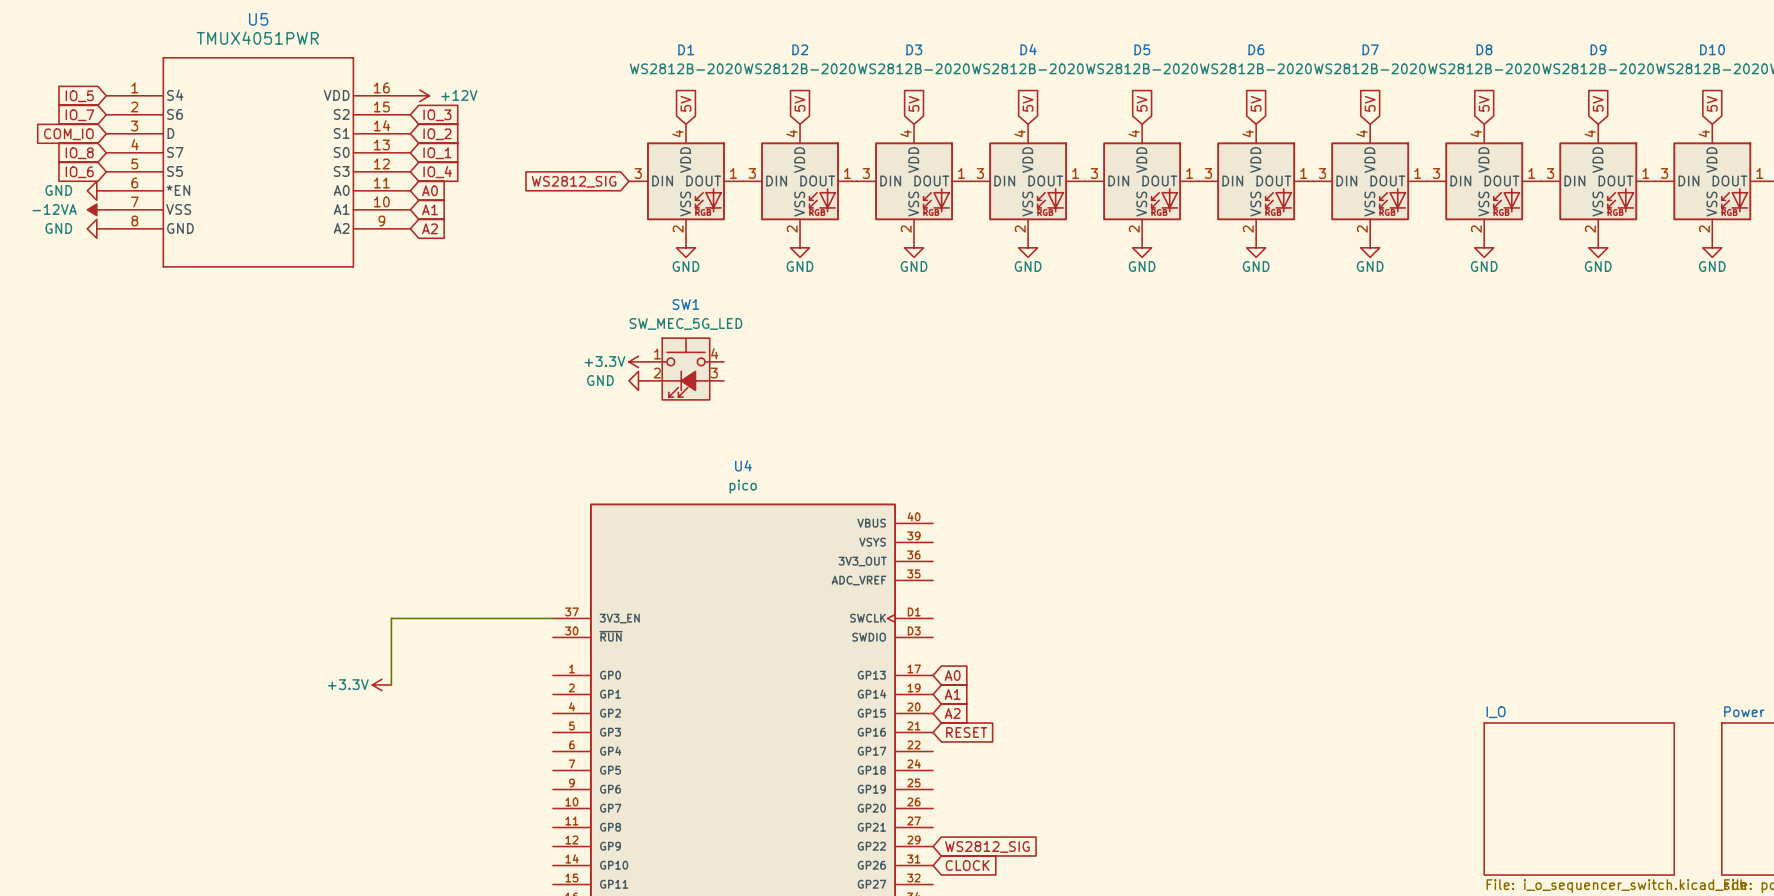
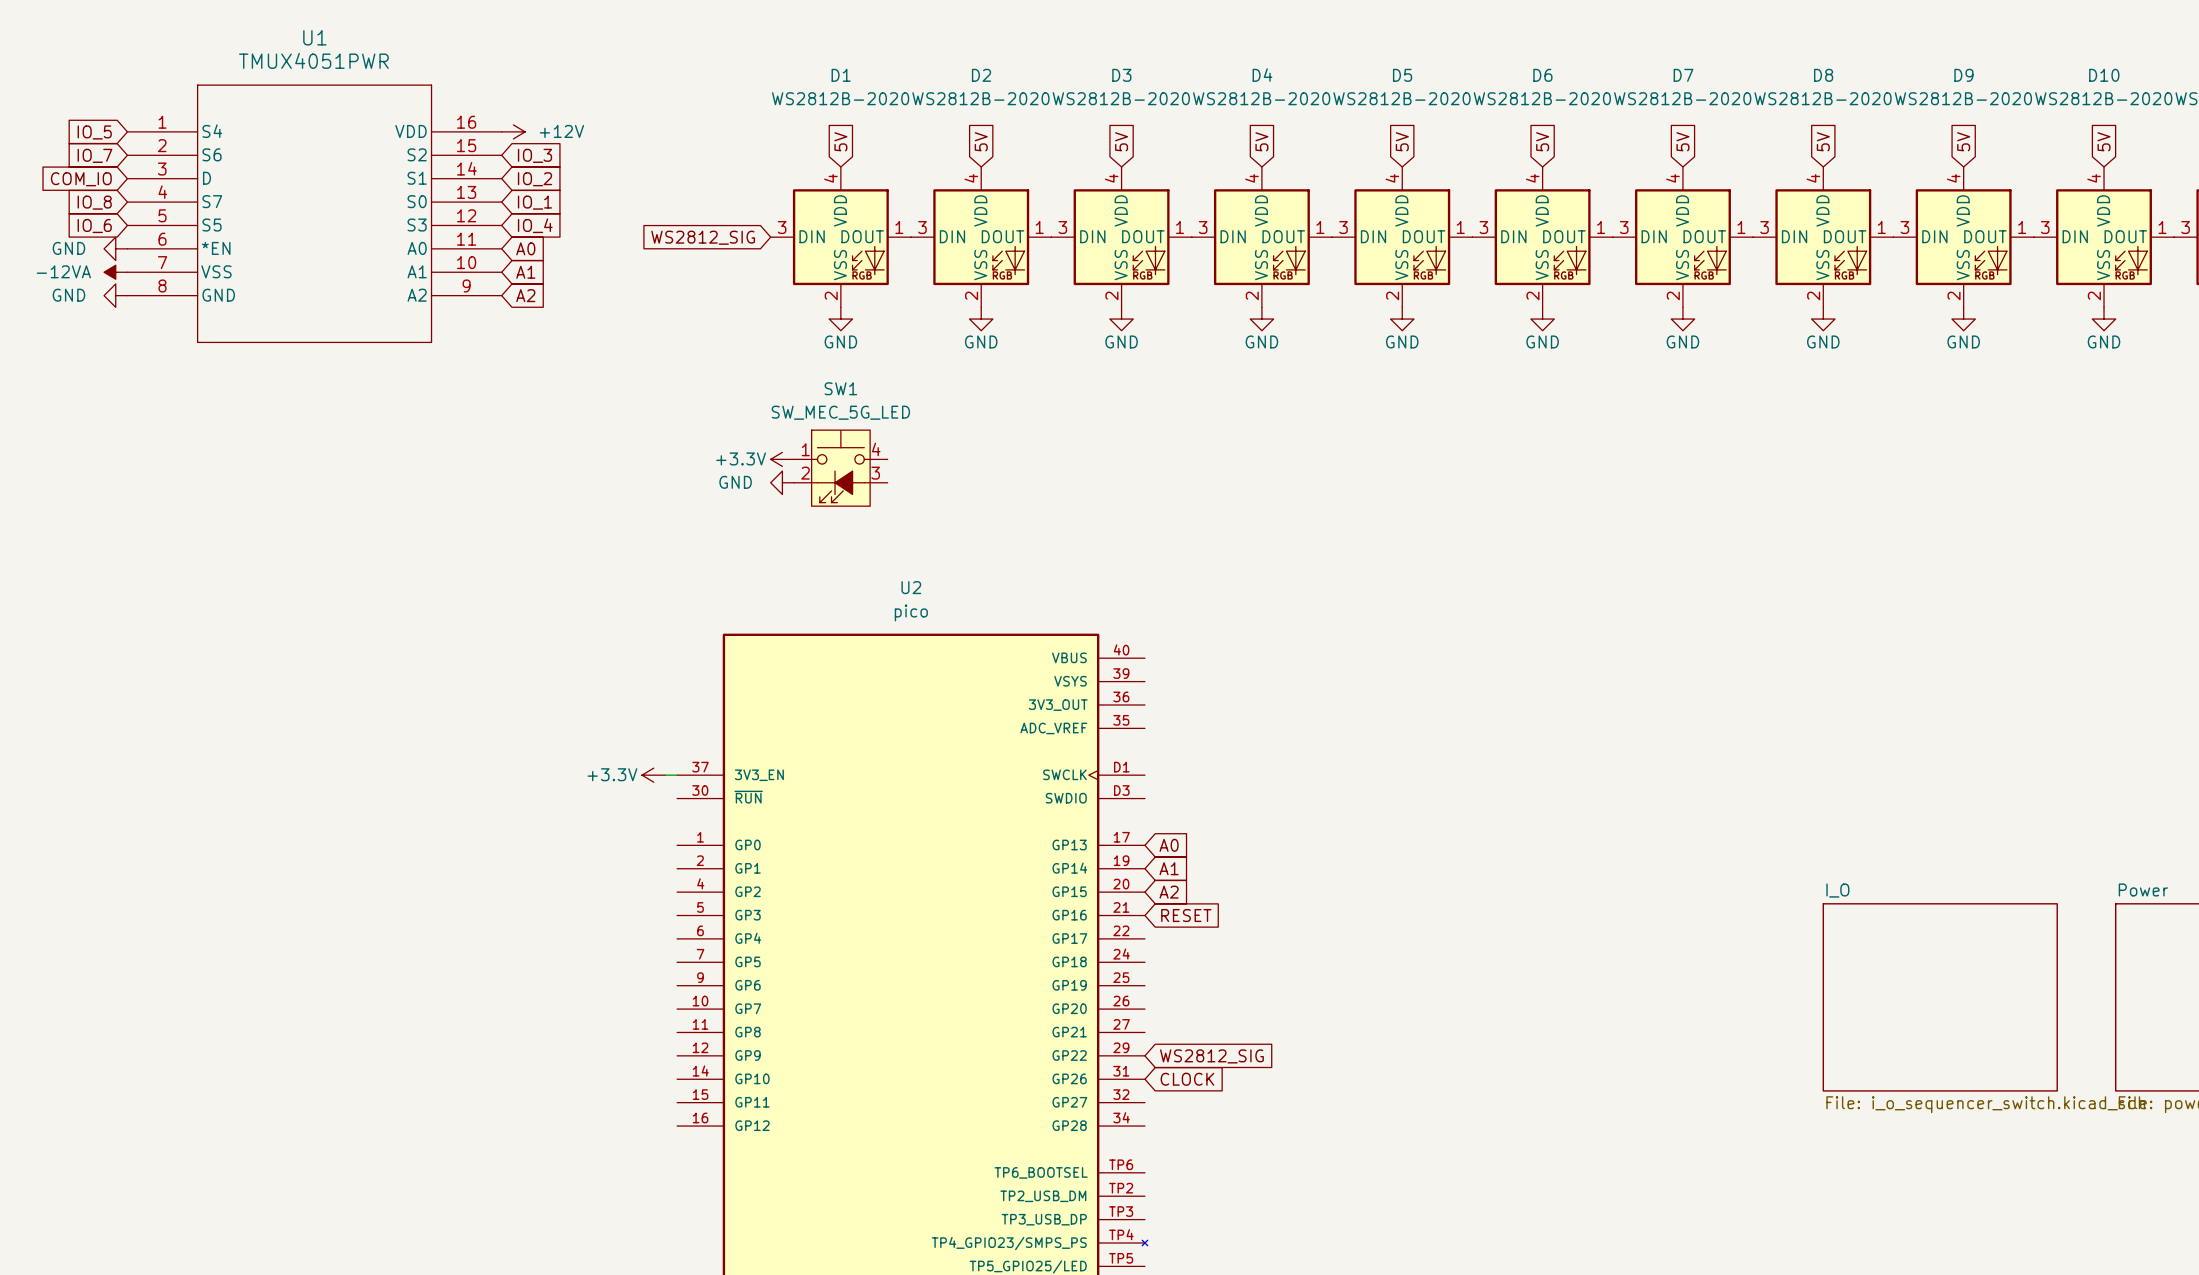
U5 name: U5 (258, 19) -> U1 (314, 37)
U4 name: U4 (743, 465) -> U2 (911, 587)
wire: (543, 618) (391, 618) (391, 684) -> none
power symbol position: +3.3V (381, 684) -> +3.3V (653, 775)

